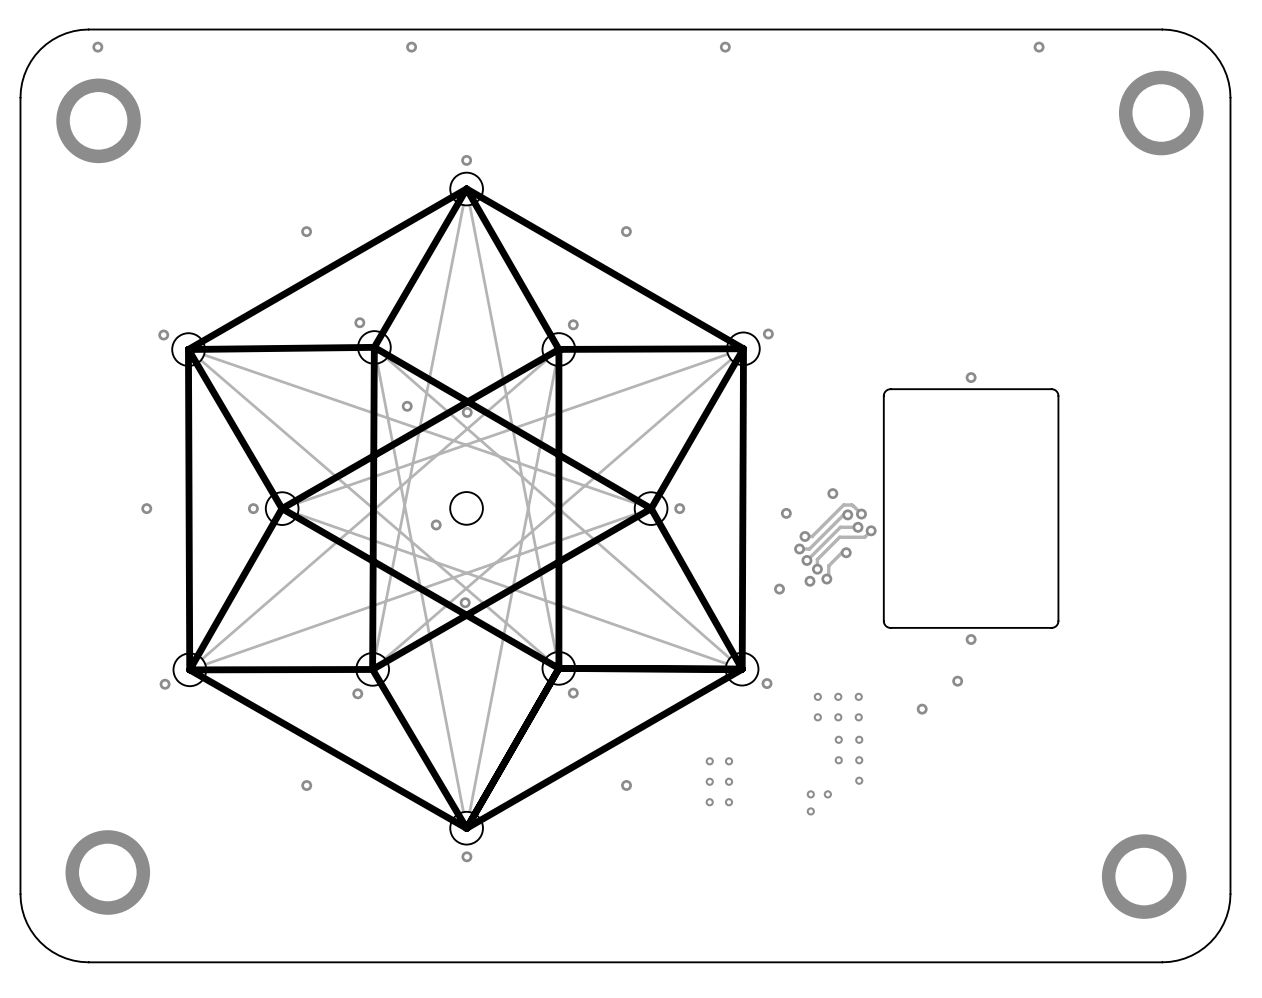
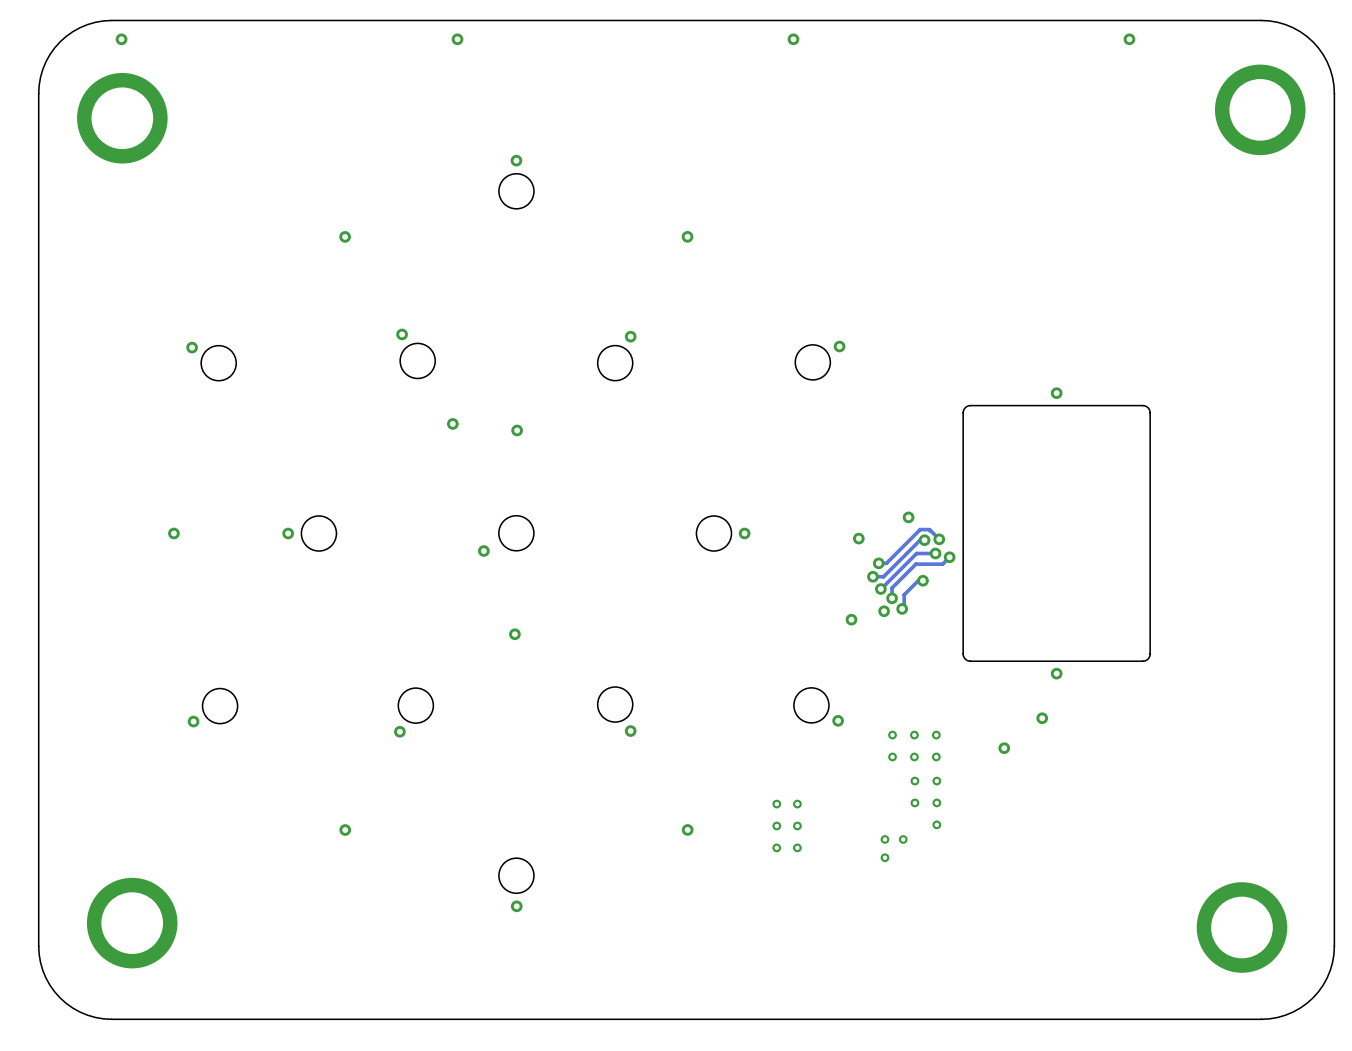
track: (466, 188) (558, 668) (188, 349) -> none
track: (466, 188) (372, 669) (743, 348) -> none
line: (466, 188) (374, 347) -> none
line: (466, 188) (188, 349) -> none
line: (466, 188) (743, 348) -> none
line: (466, 188) (558, 349) -> none
line: (374, 347) (372, 669) -> none
line: (374, 347) (188, 349) -> none
line: (374, 347) (651, 508) -> none
track: (743, 348) (282, 508) (742, 669) -> none
line: (743, 348) (651, 508) -> none
line: (743, 348) (558, 349) -> none
line: (743, 348) (742, 669) -> none
track: (188, 349) (651, 508) (189, 669) -> none
line: (188, 349) (189, 669) -> none
line: (188, 349) (282, 508) -> none
line: (558, 349) (282, 508) -> none
line: (558, 349) (558, 668) -> none
line: (282, 508) (189, 669) -> none
line: (282, 508) (558, 668) -> none
line: (651, 508) (742, 669) -> none
line: (651, 508) (372, 669) -> none
line: (558, 668) (466, 828) -> none
line: (558, 668) (742, 669) -> none
track: (189, 669) (558, 349) (466, 828) -> none
line: (189, 669) (466, 828) -> none
line: (372, 669) (189, 669) -> none
line: (372, 669) (466, 828) -> none
track: (742, 669) (374, 347) (466, 828) -> none
line: (742, 669) (466, 828) -> none

